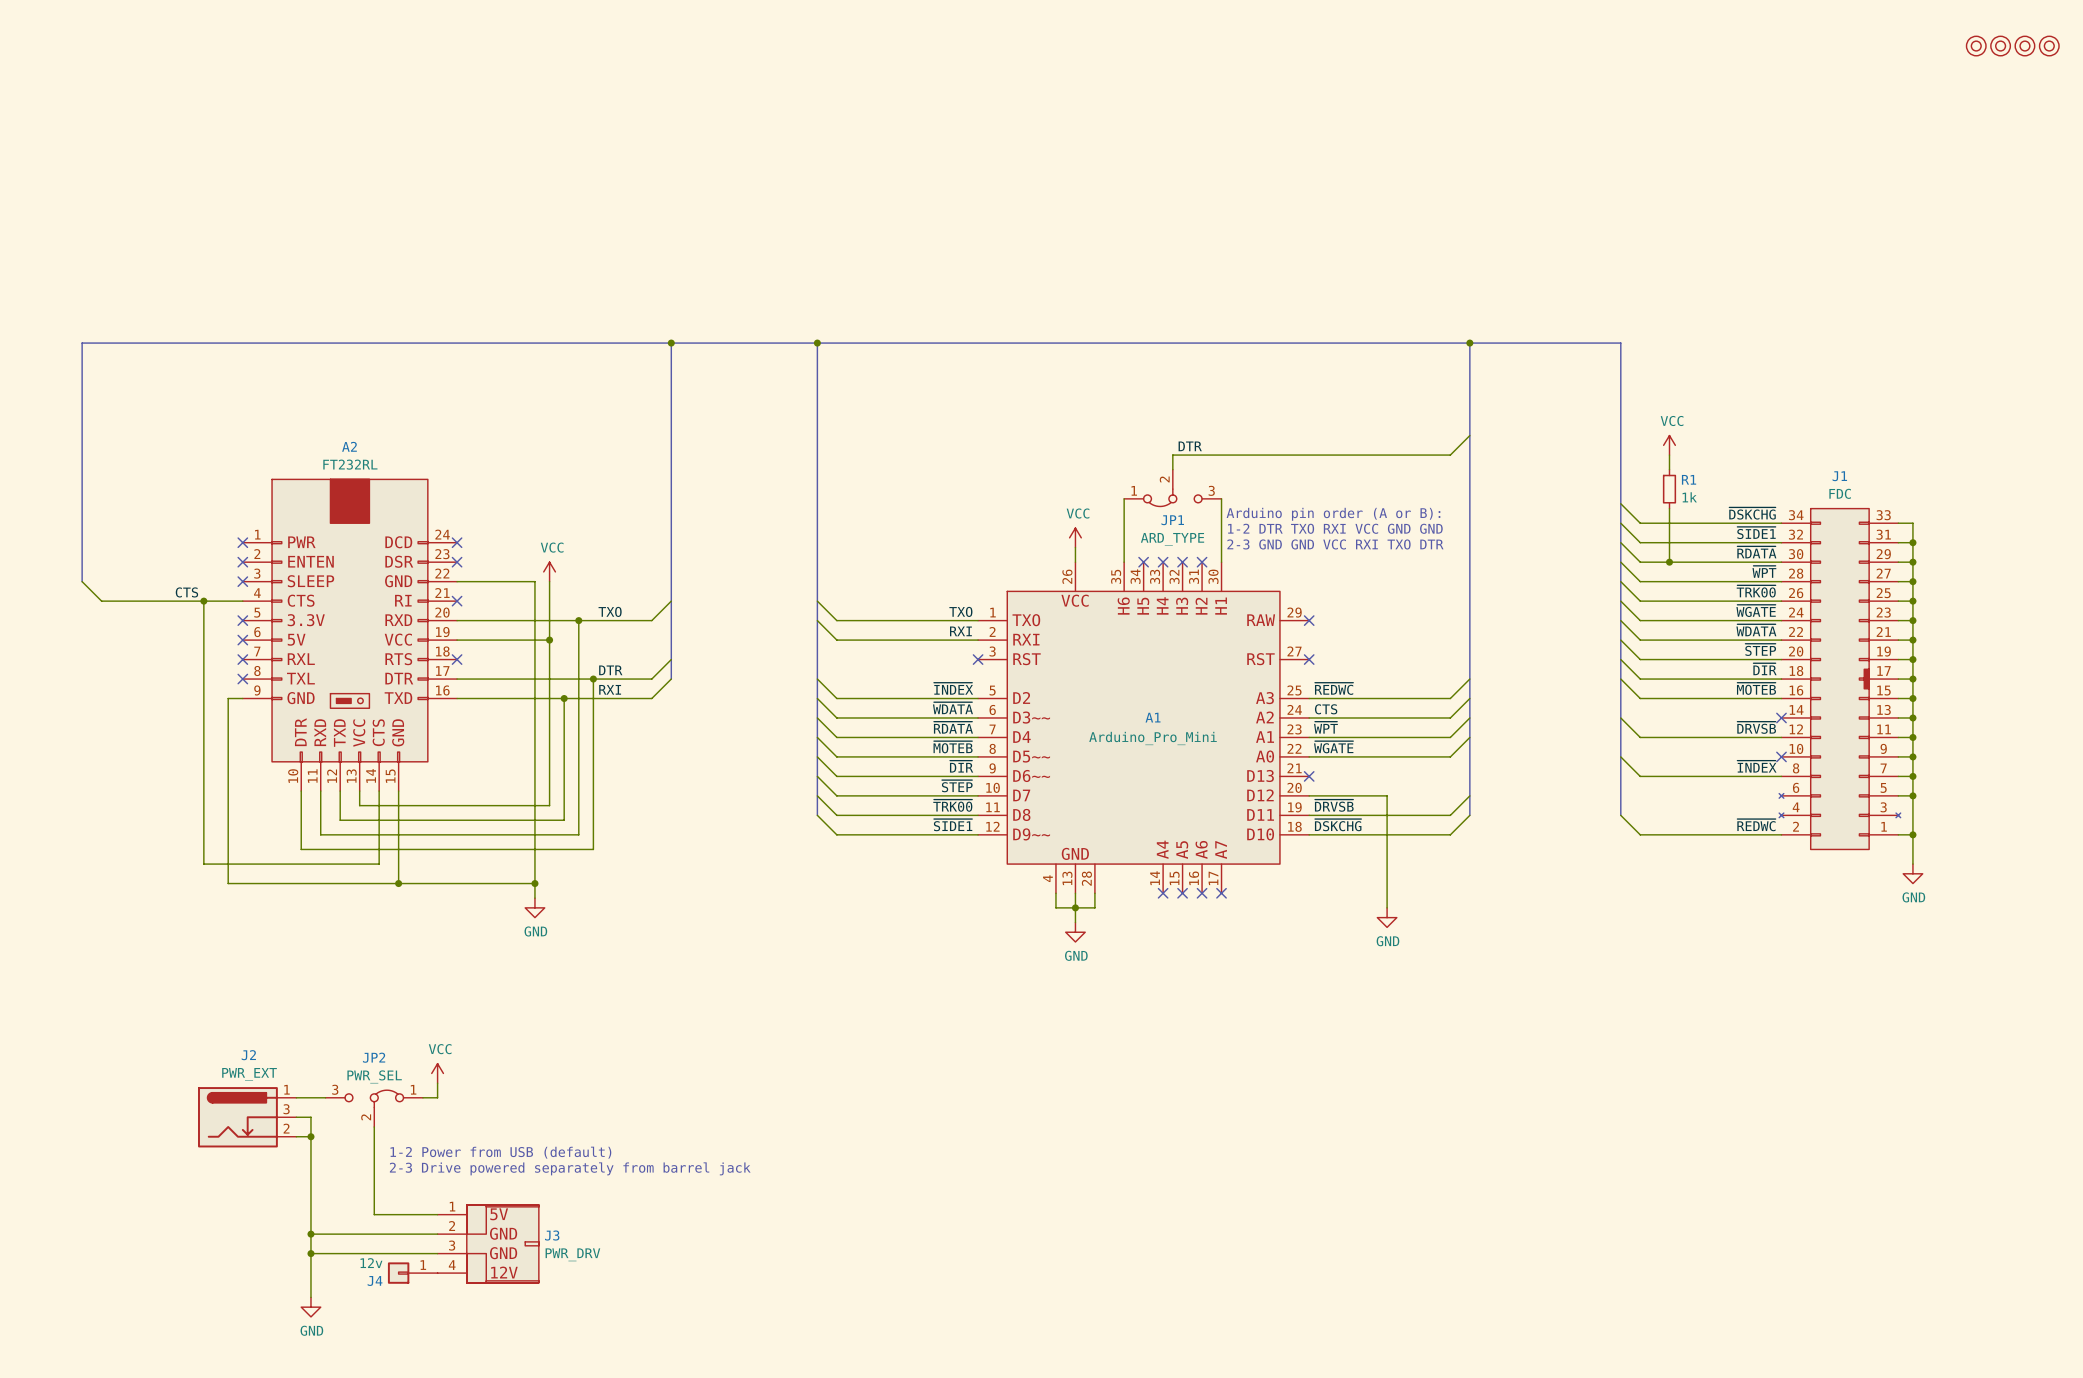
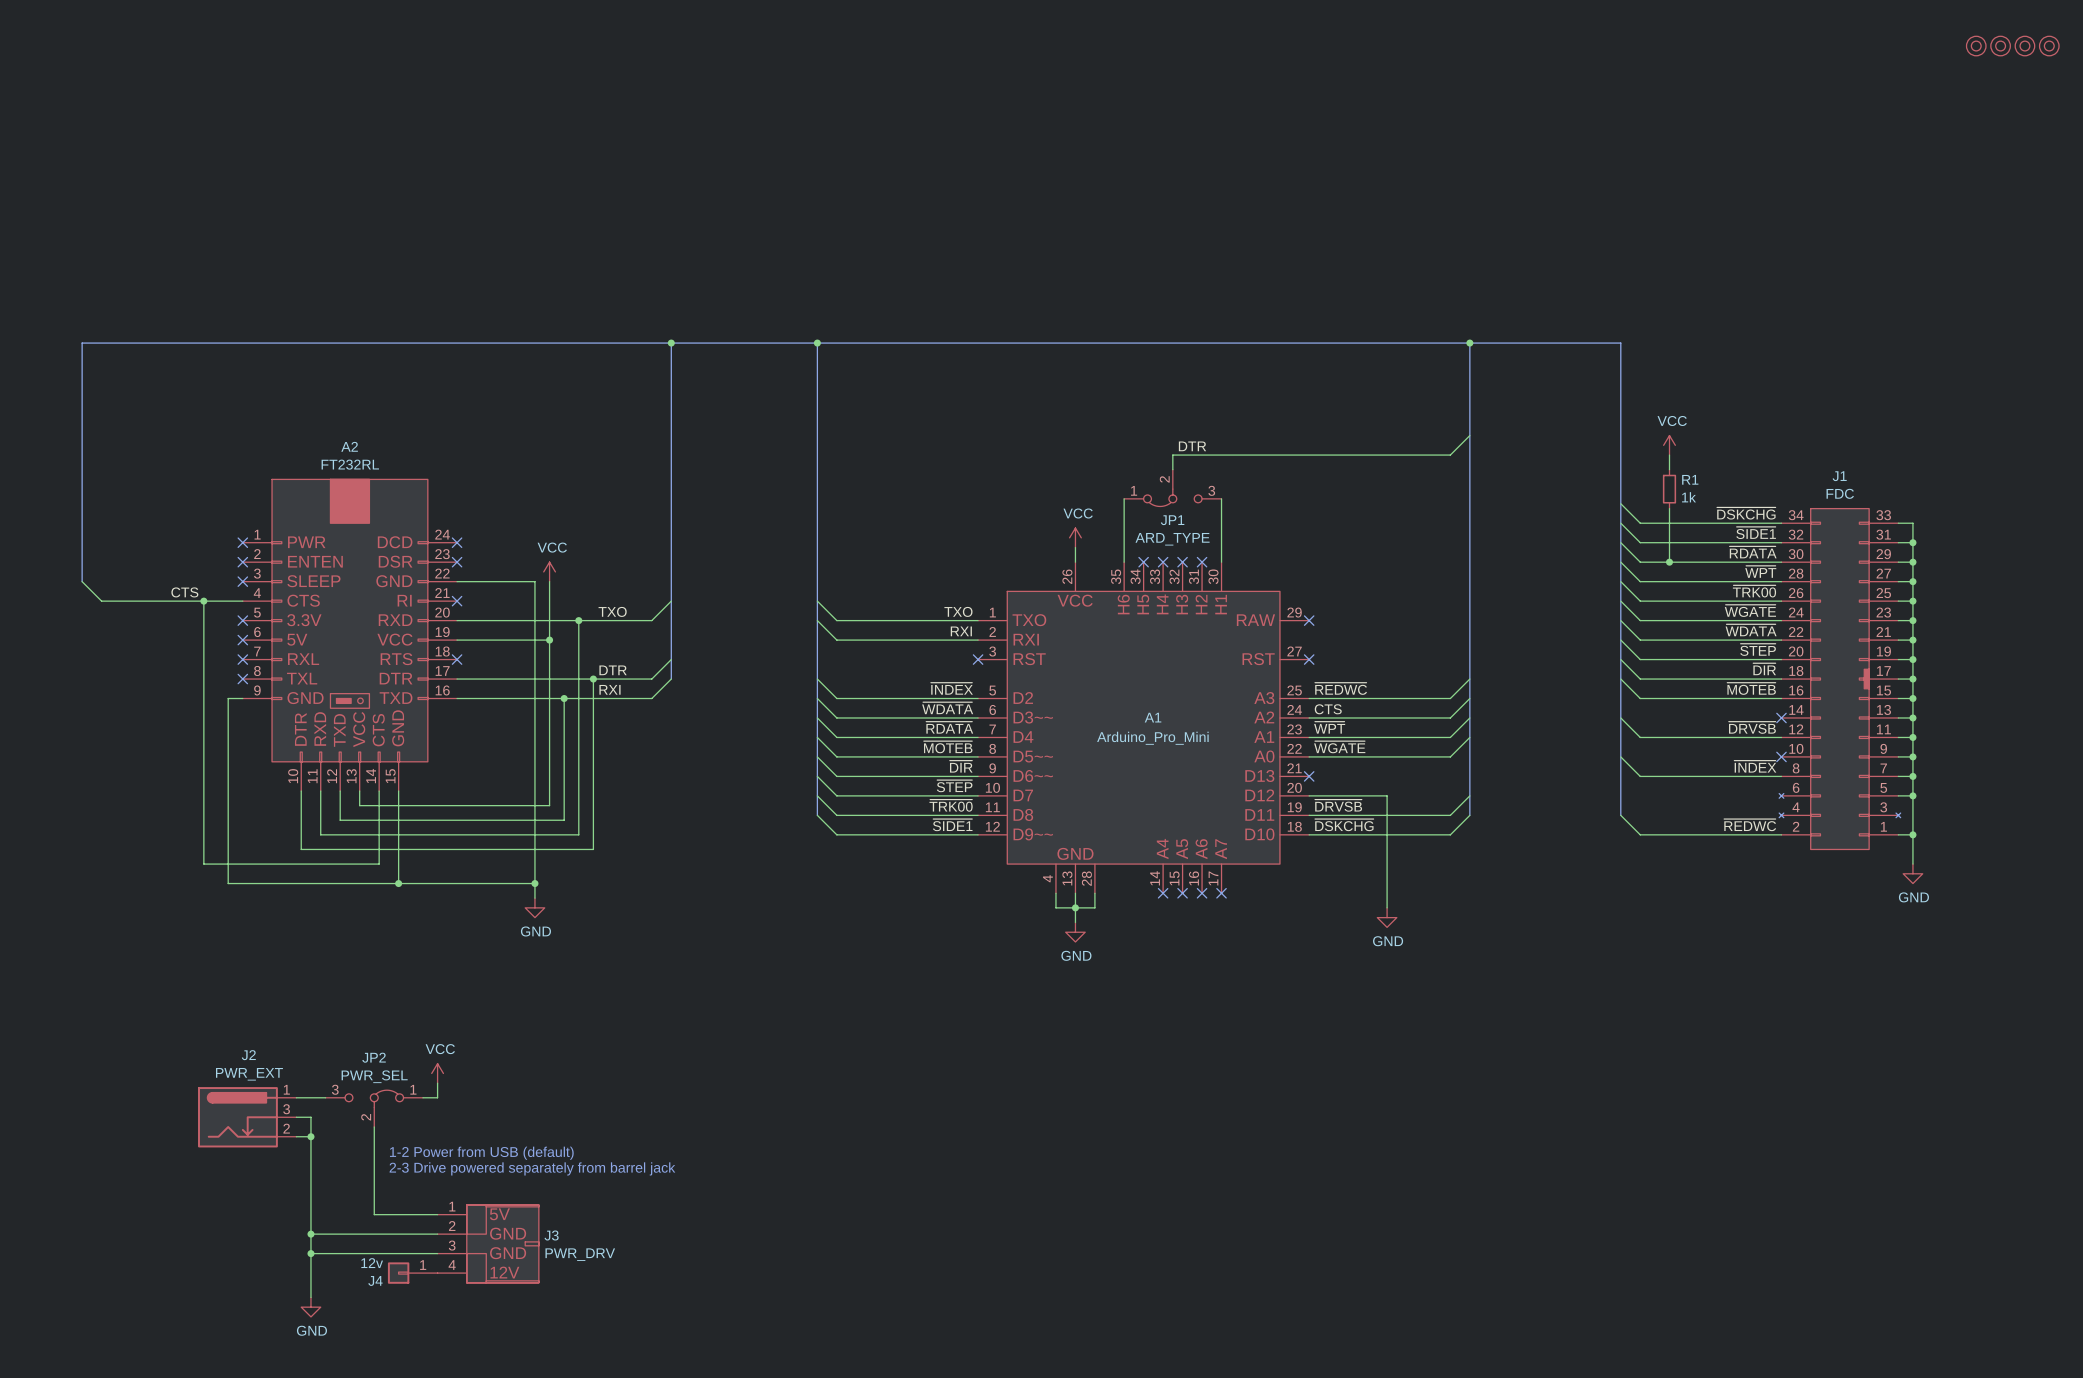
text: Arduino pin order (A or B): (1333, 514) -> none
text: 1-2 DTR TXO RXI VCC GND GND (1335, 528) -> none
text: 2-3 GND GND VCC RXI TXO DTR (1335, 544) -> none

